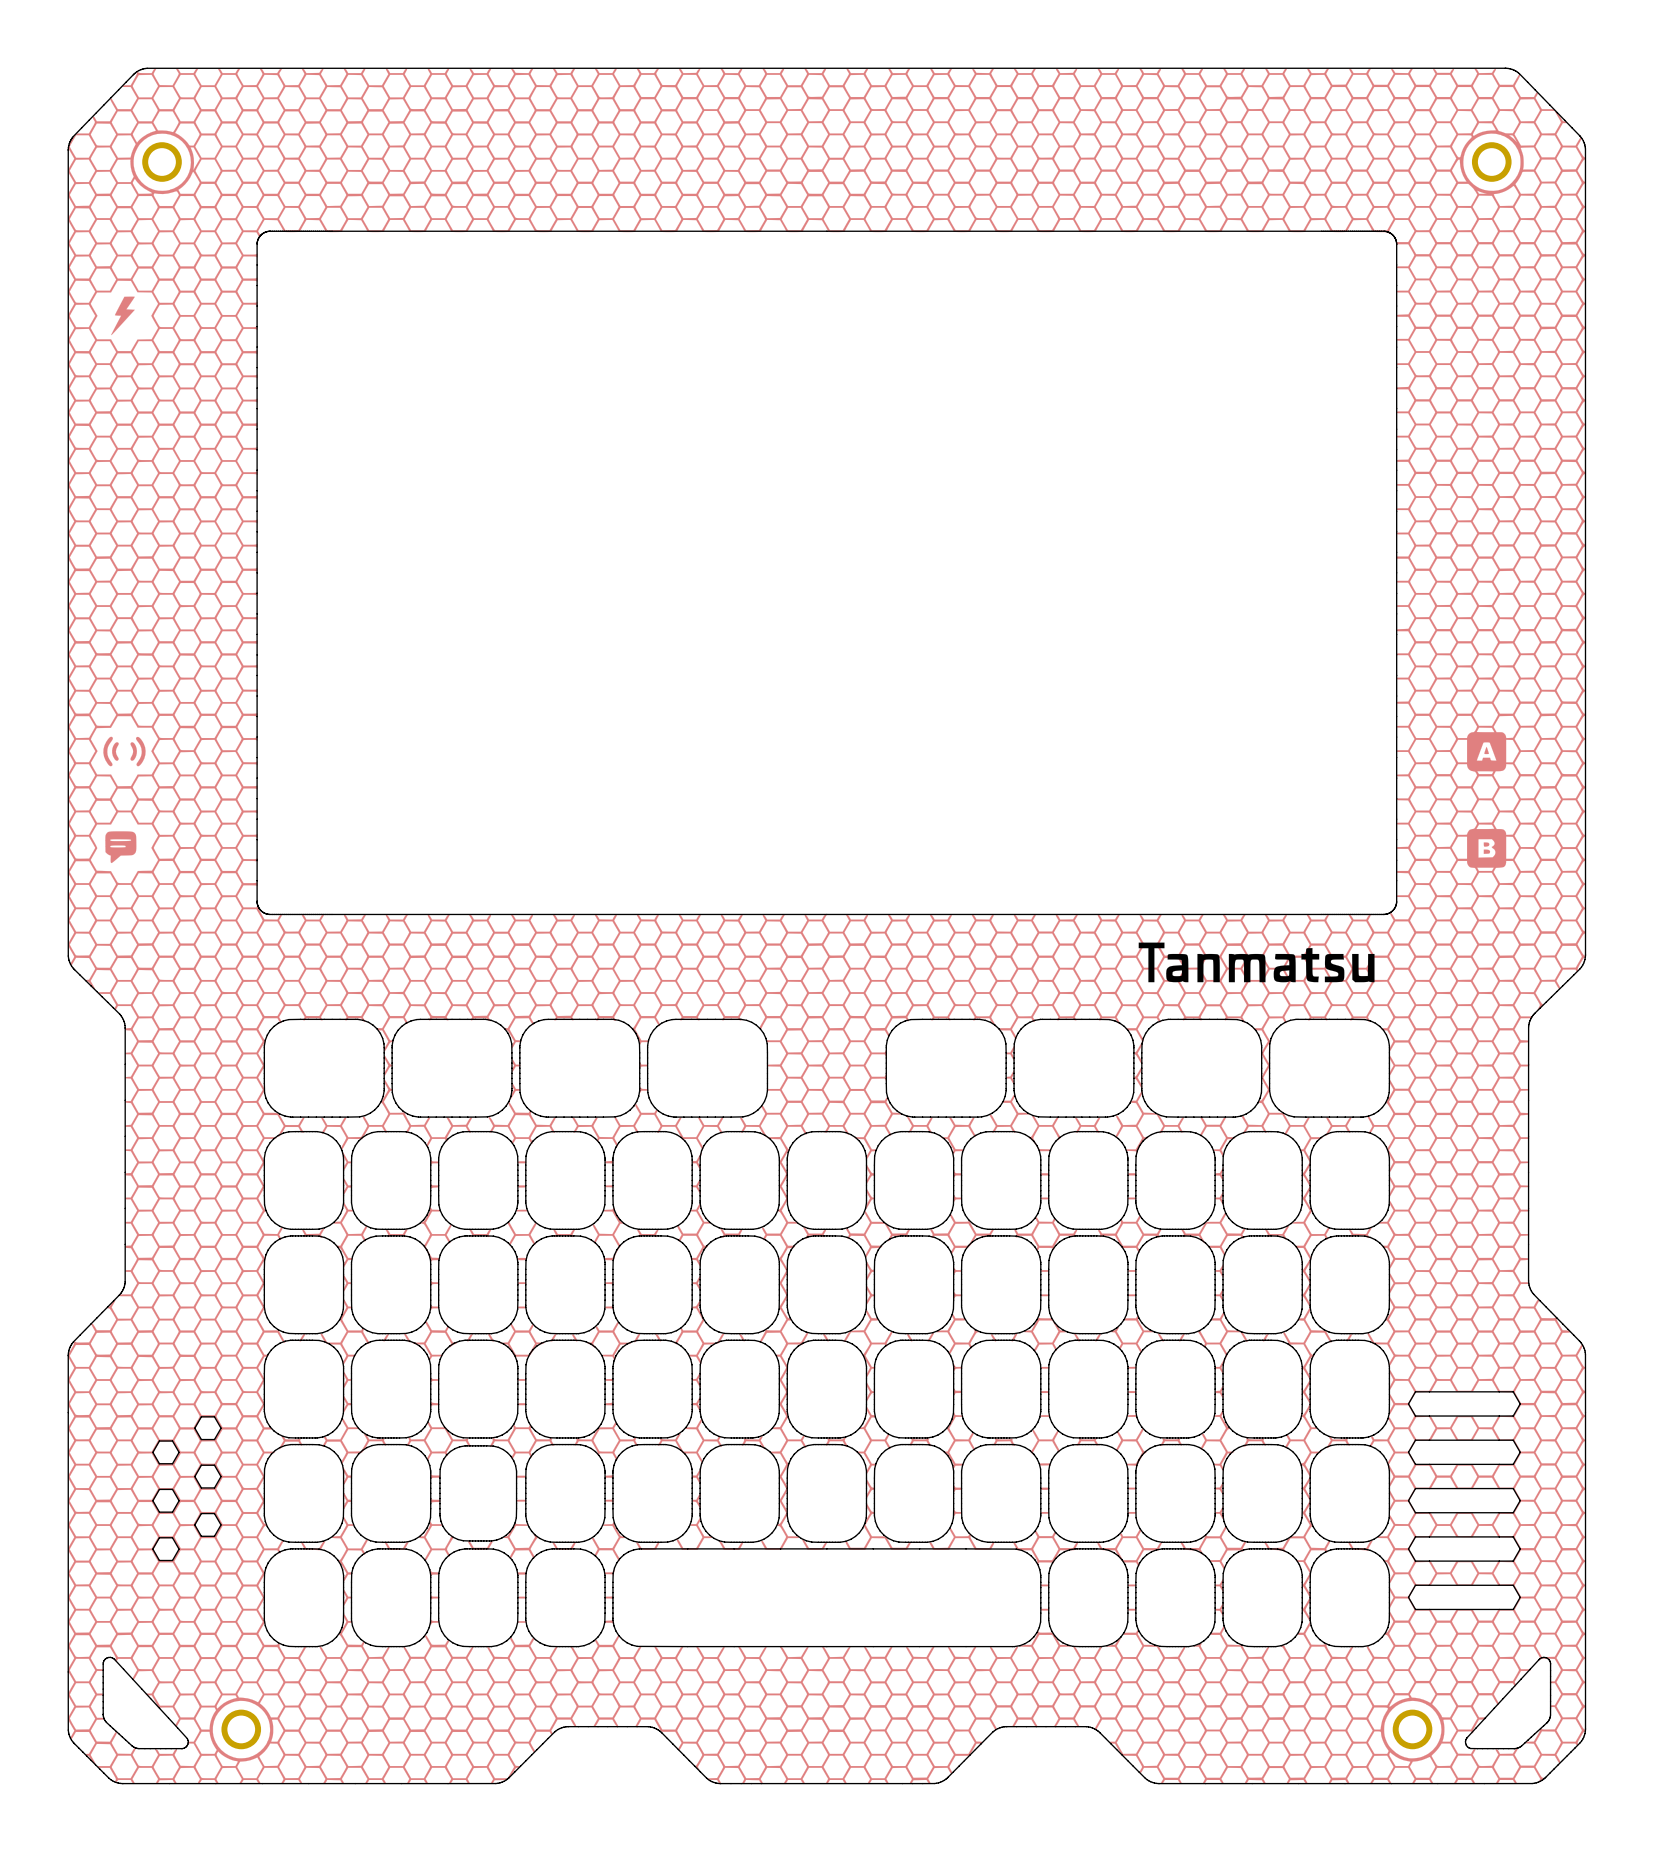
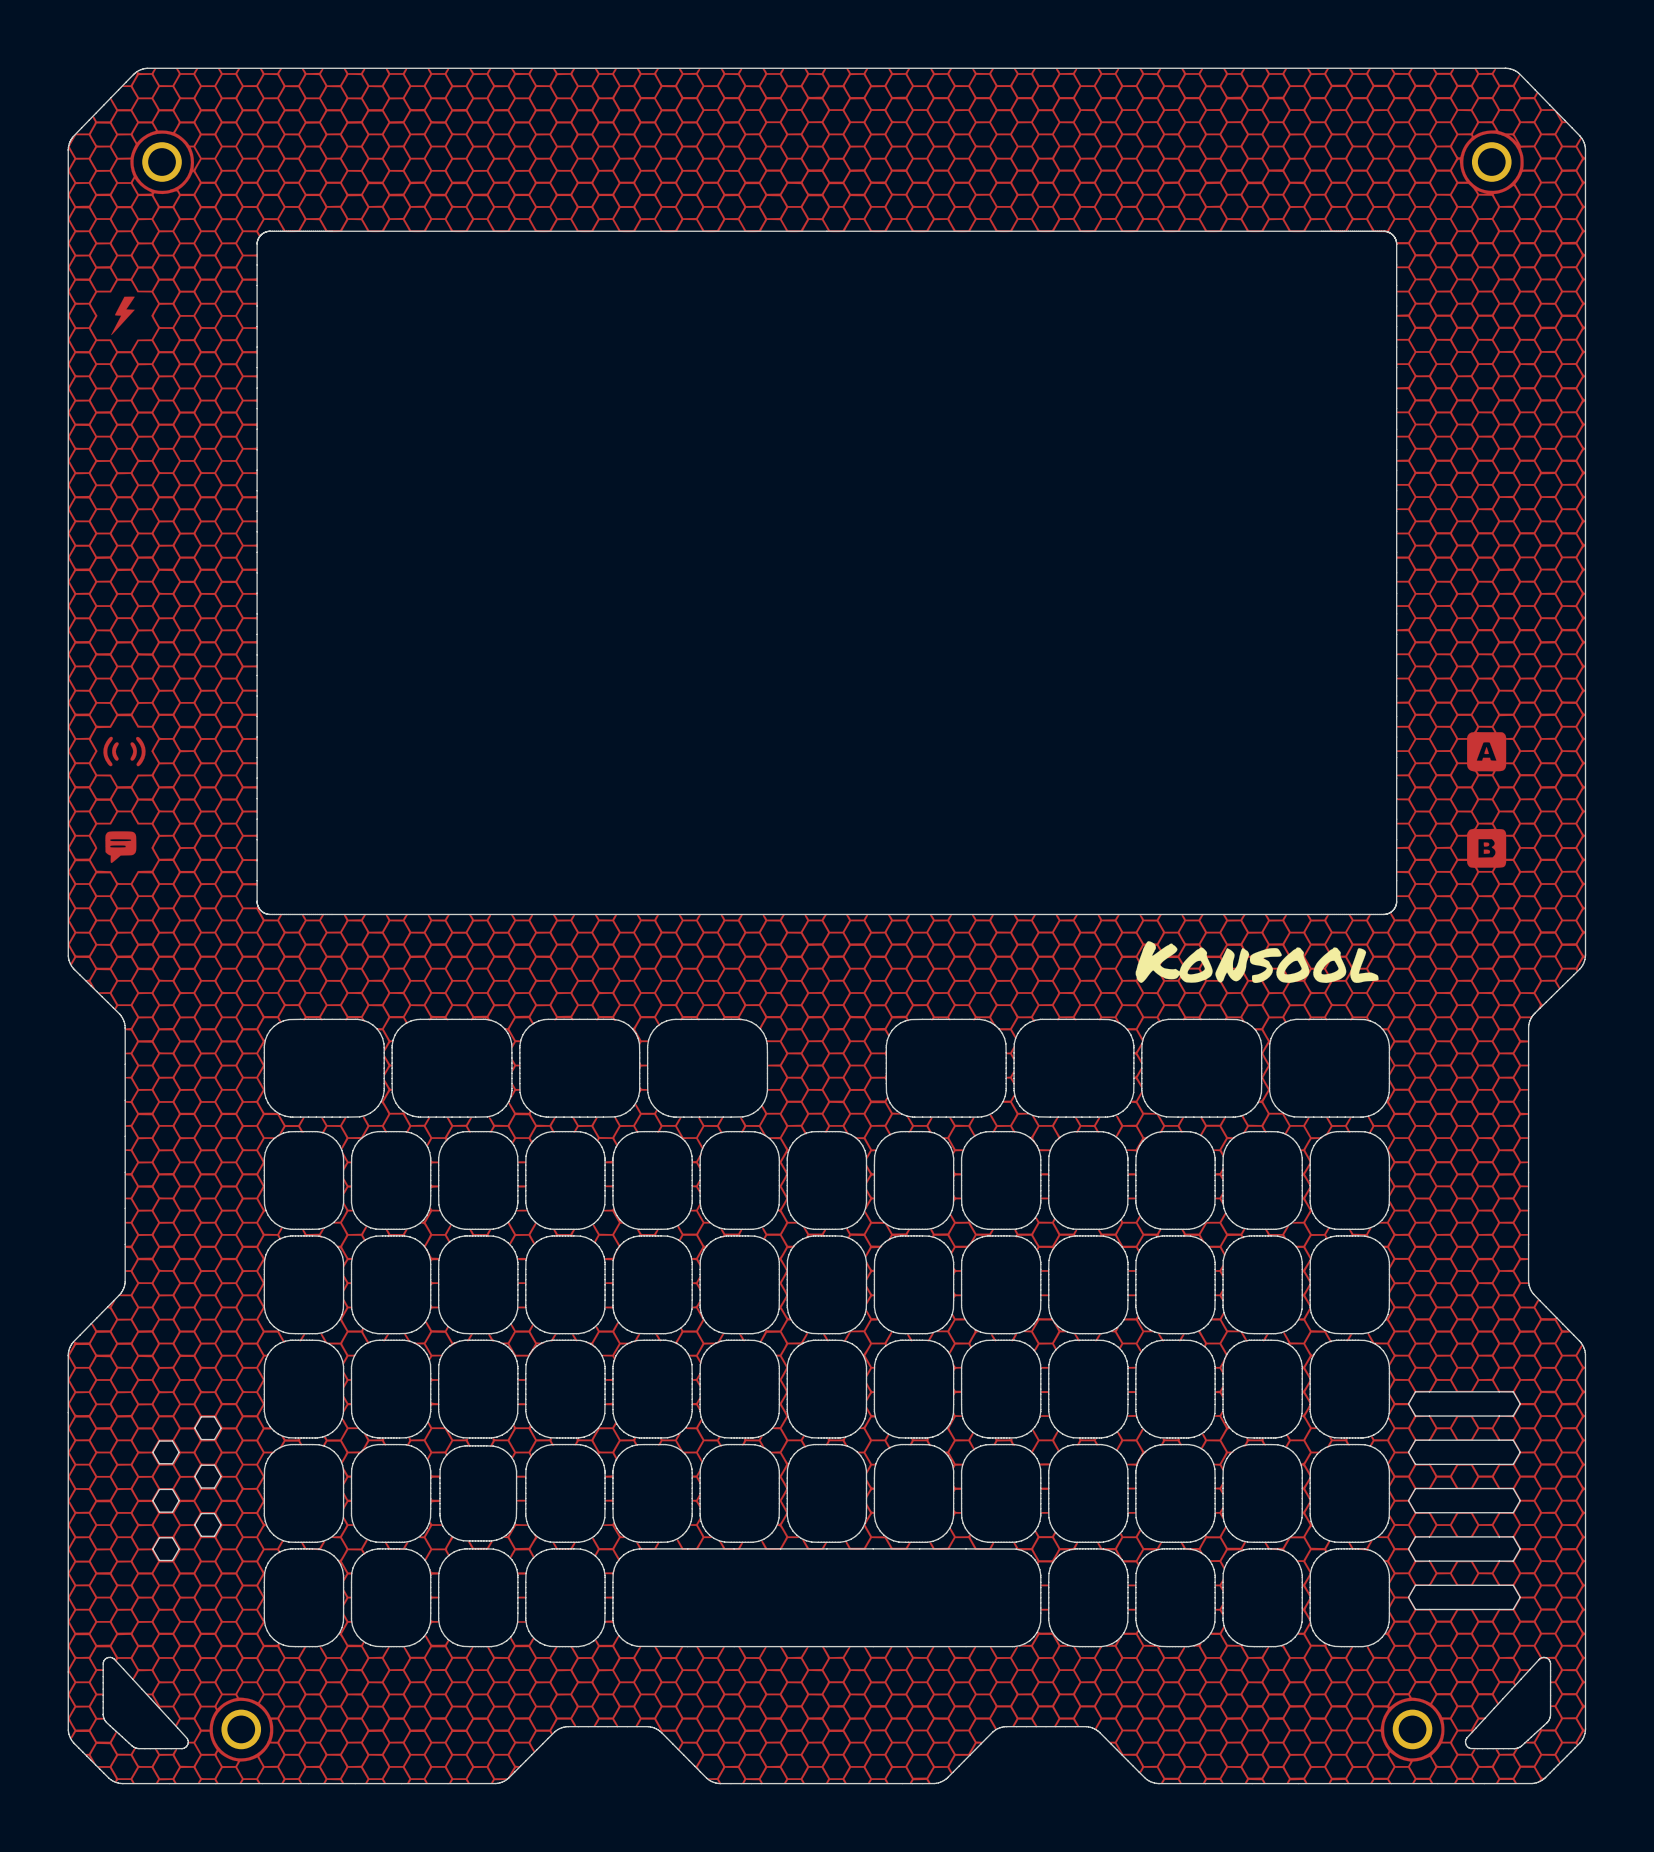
drawing shape: [67, 67, 1587, 1785] -> [67, 67, 1587, 1785]

